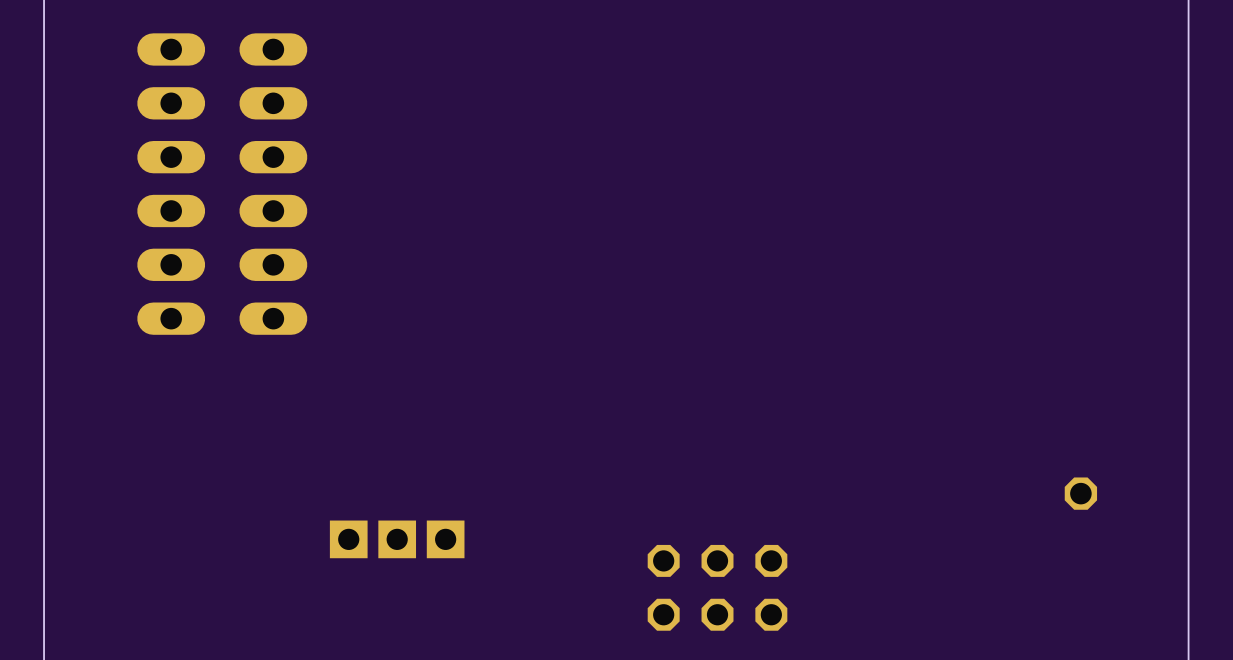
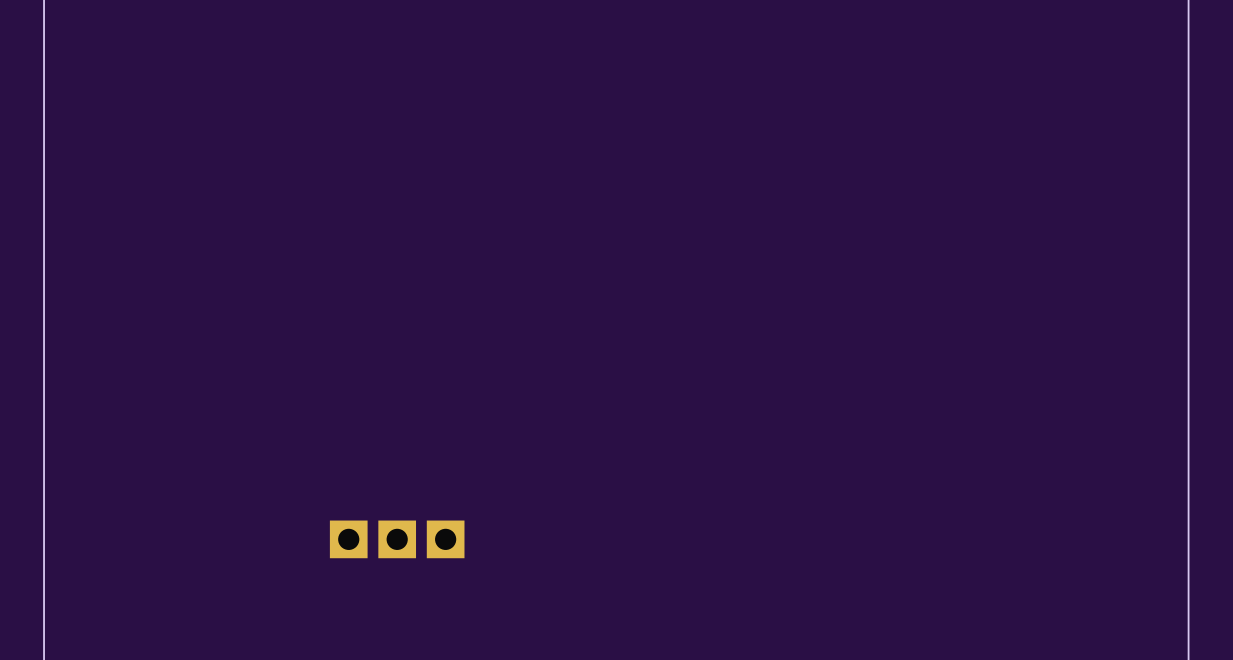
part: (171, 184) -> none
part: (273, 184) -> none
part: (1080, 493) -> none
part: (717, 587) -> none

